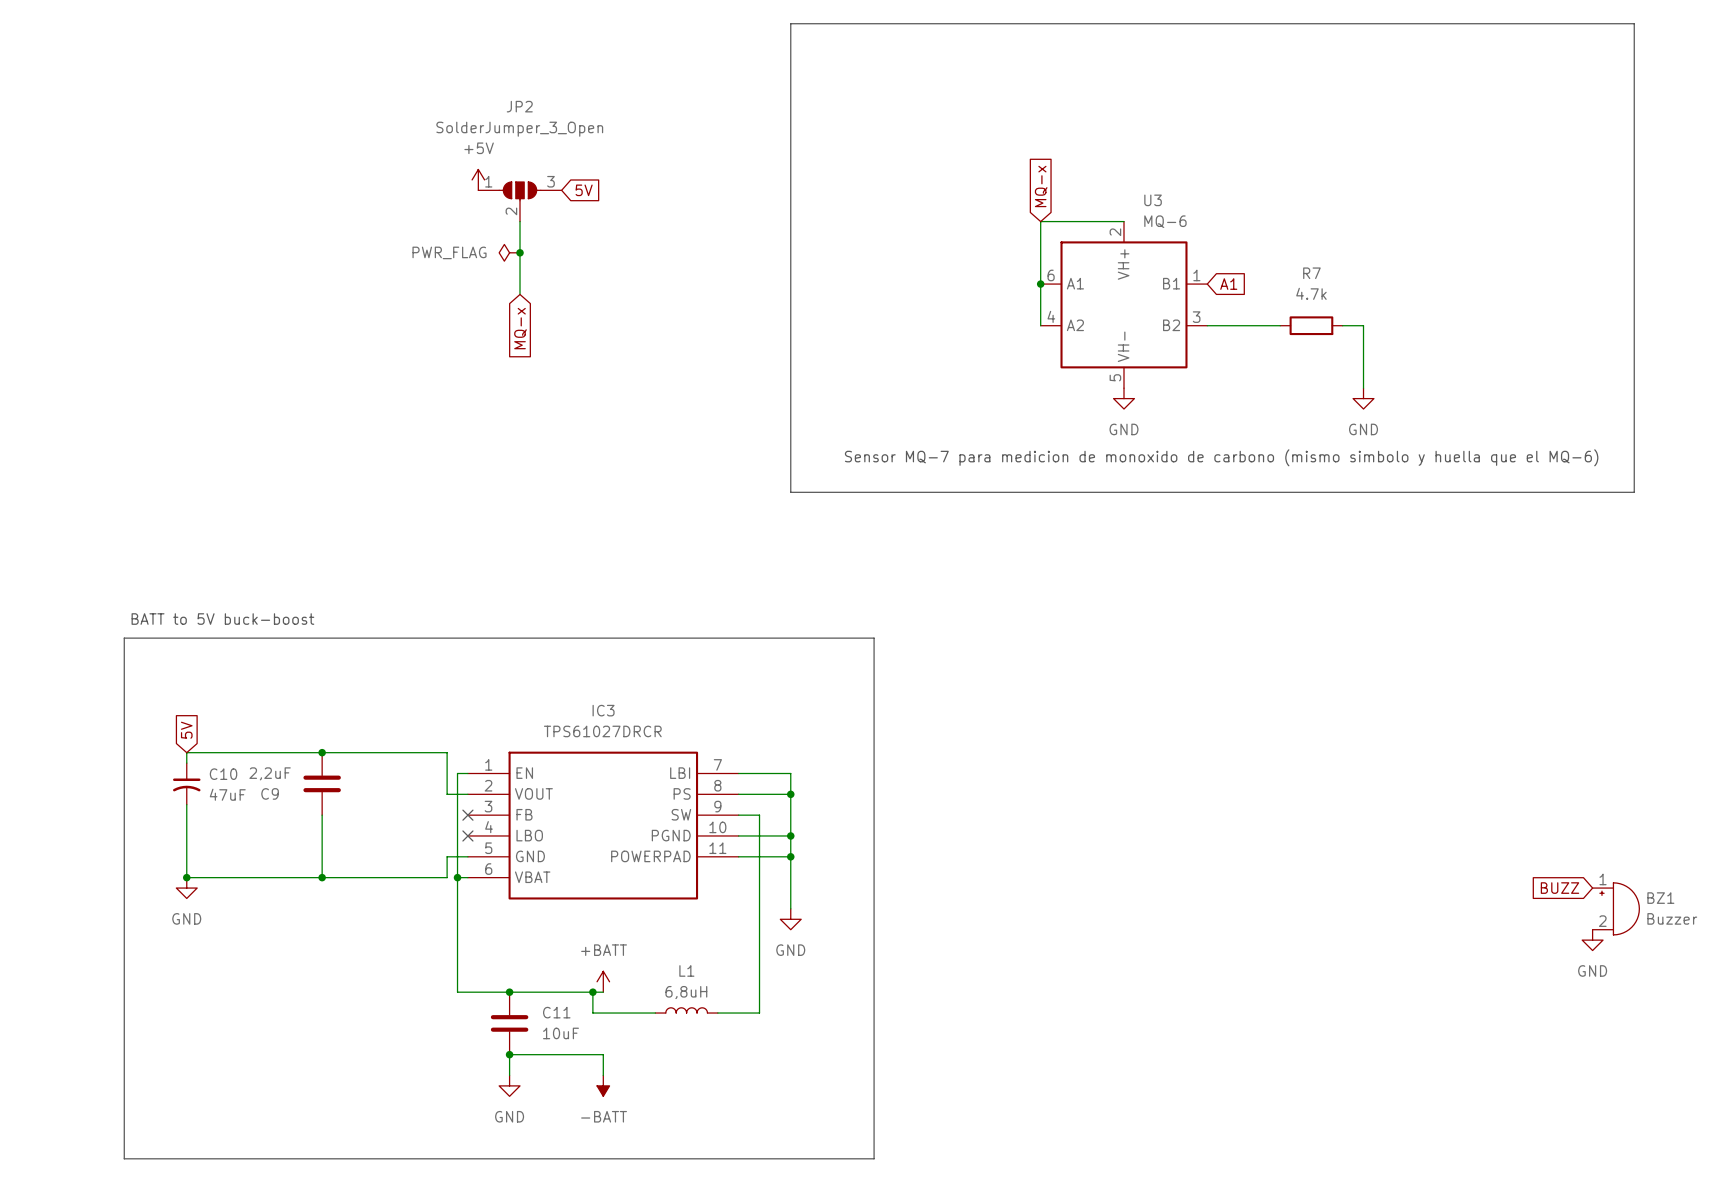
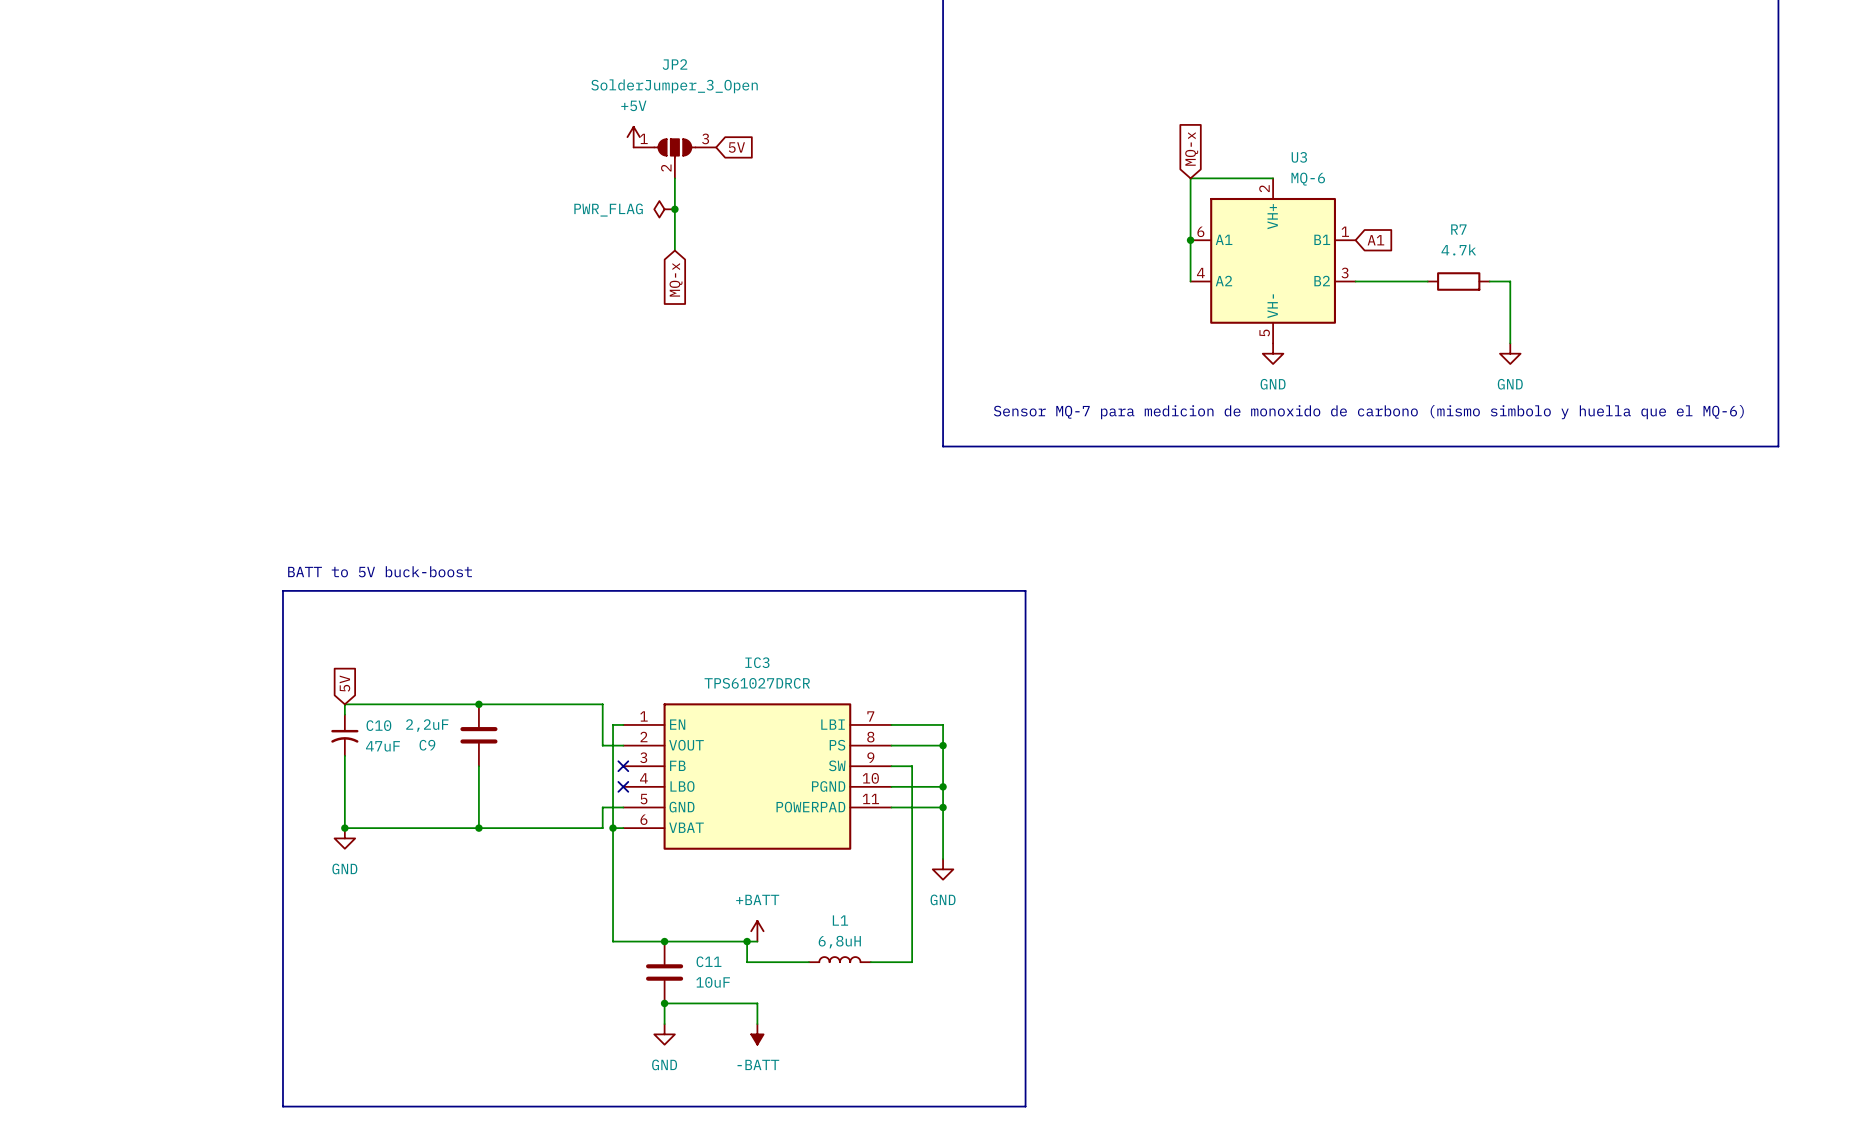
global label: BUZZ (1559, 888) -> none
BZ1: Buzzer (1615, 908) -> none
power symbol: GND (1592, 940) -> none

